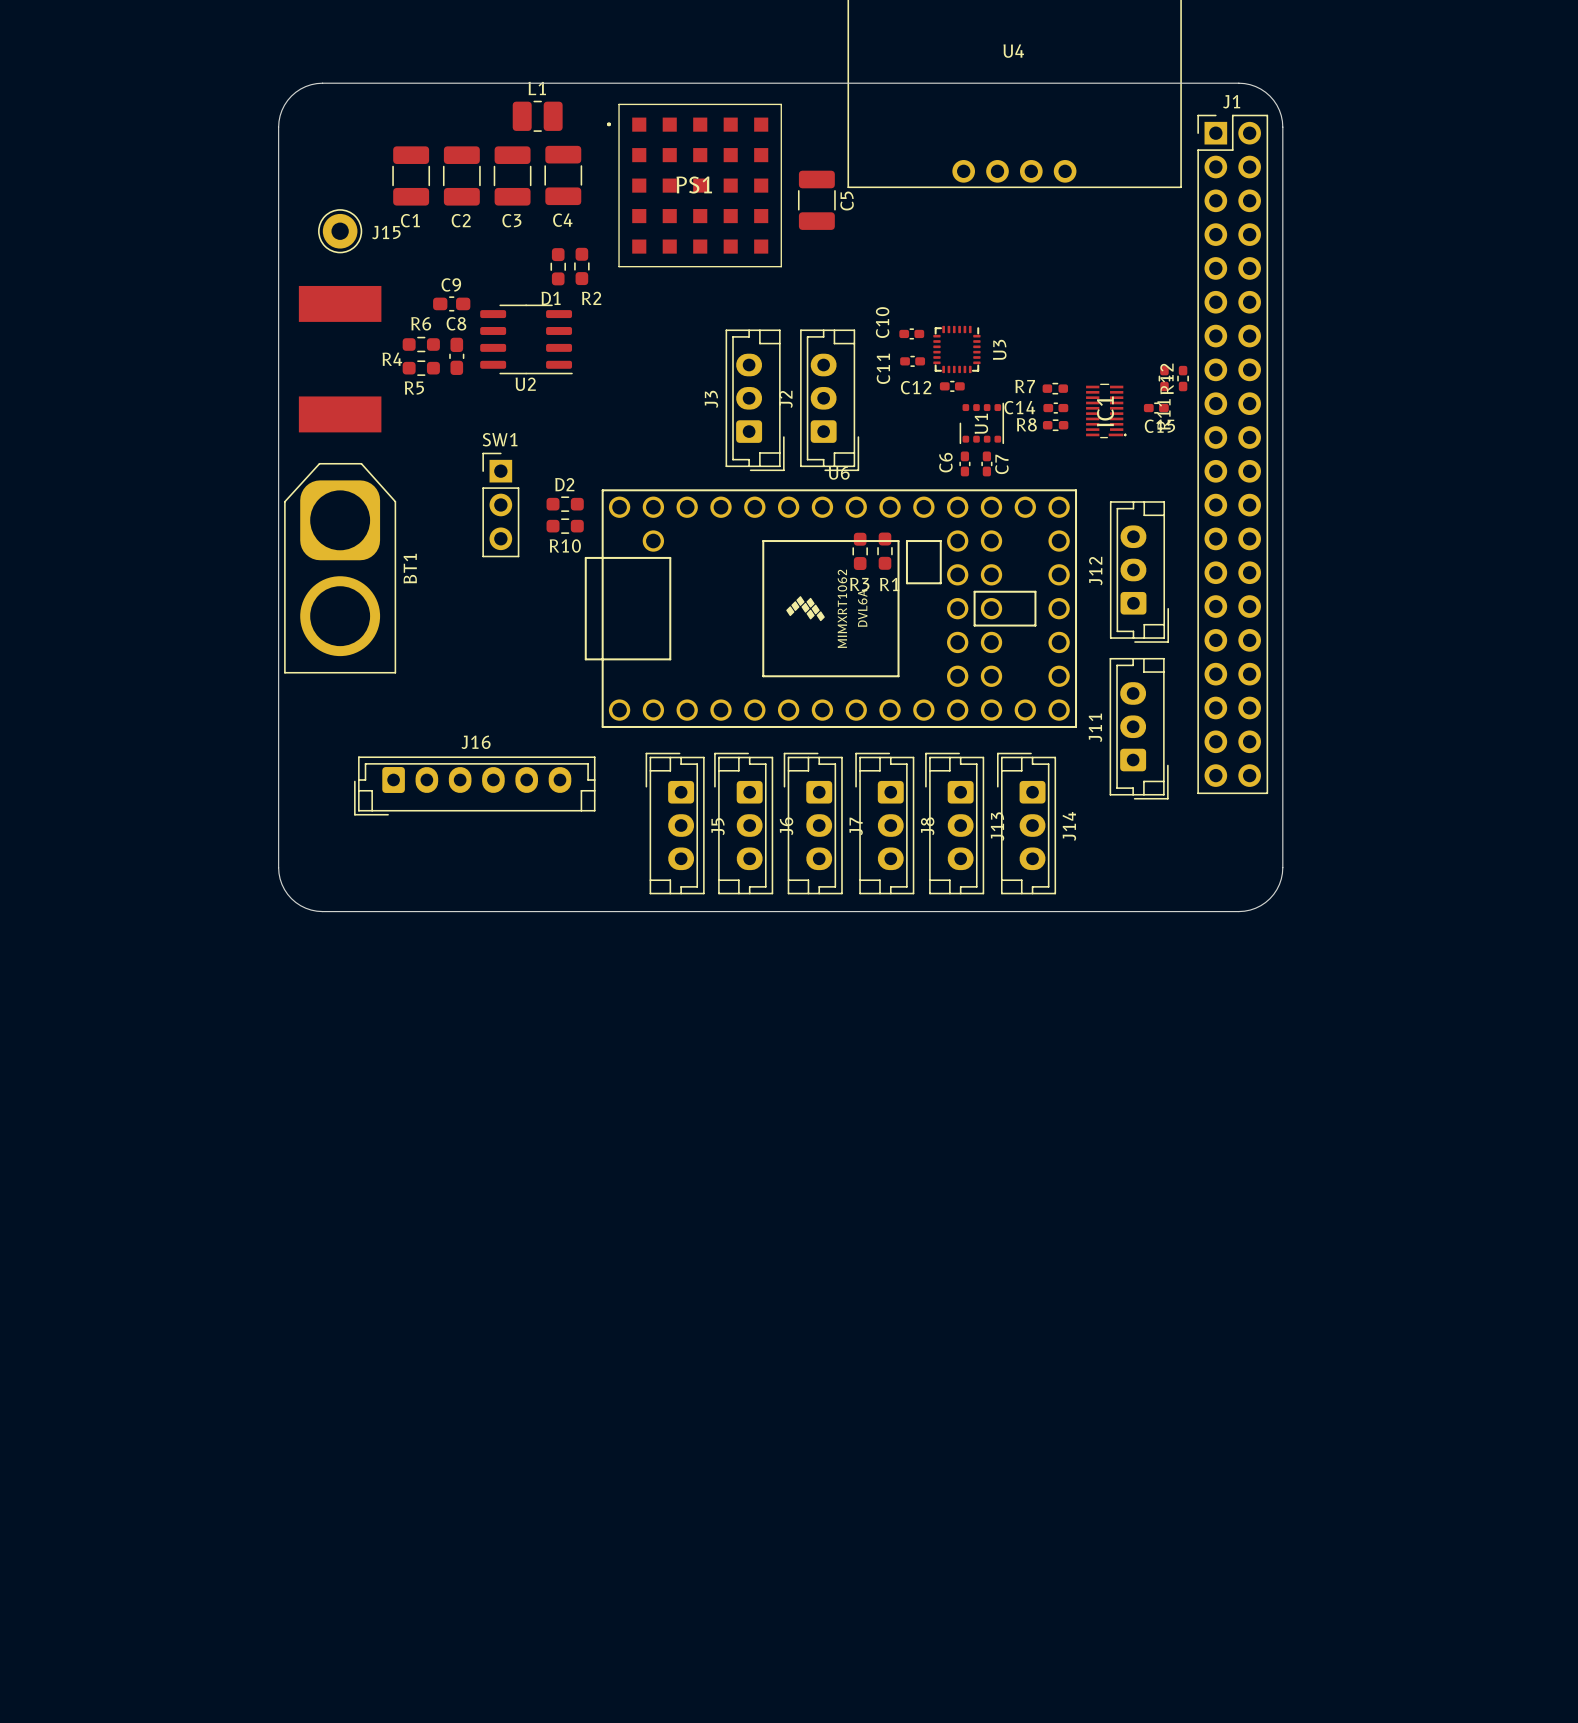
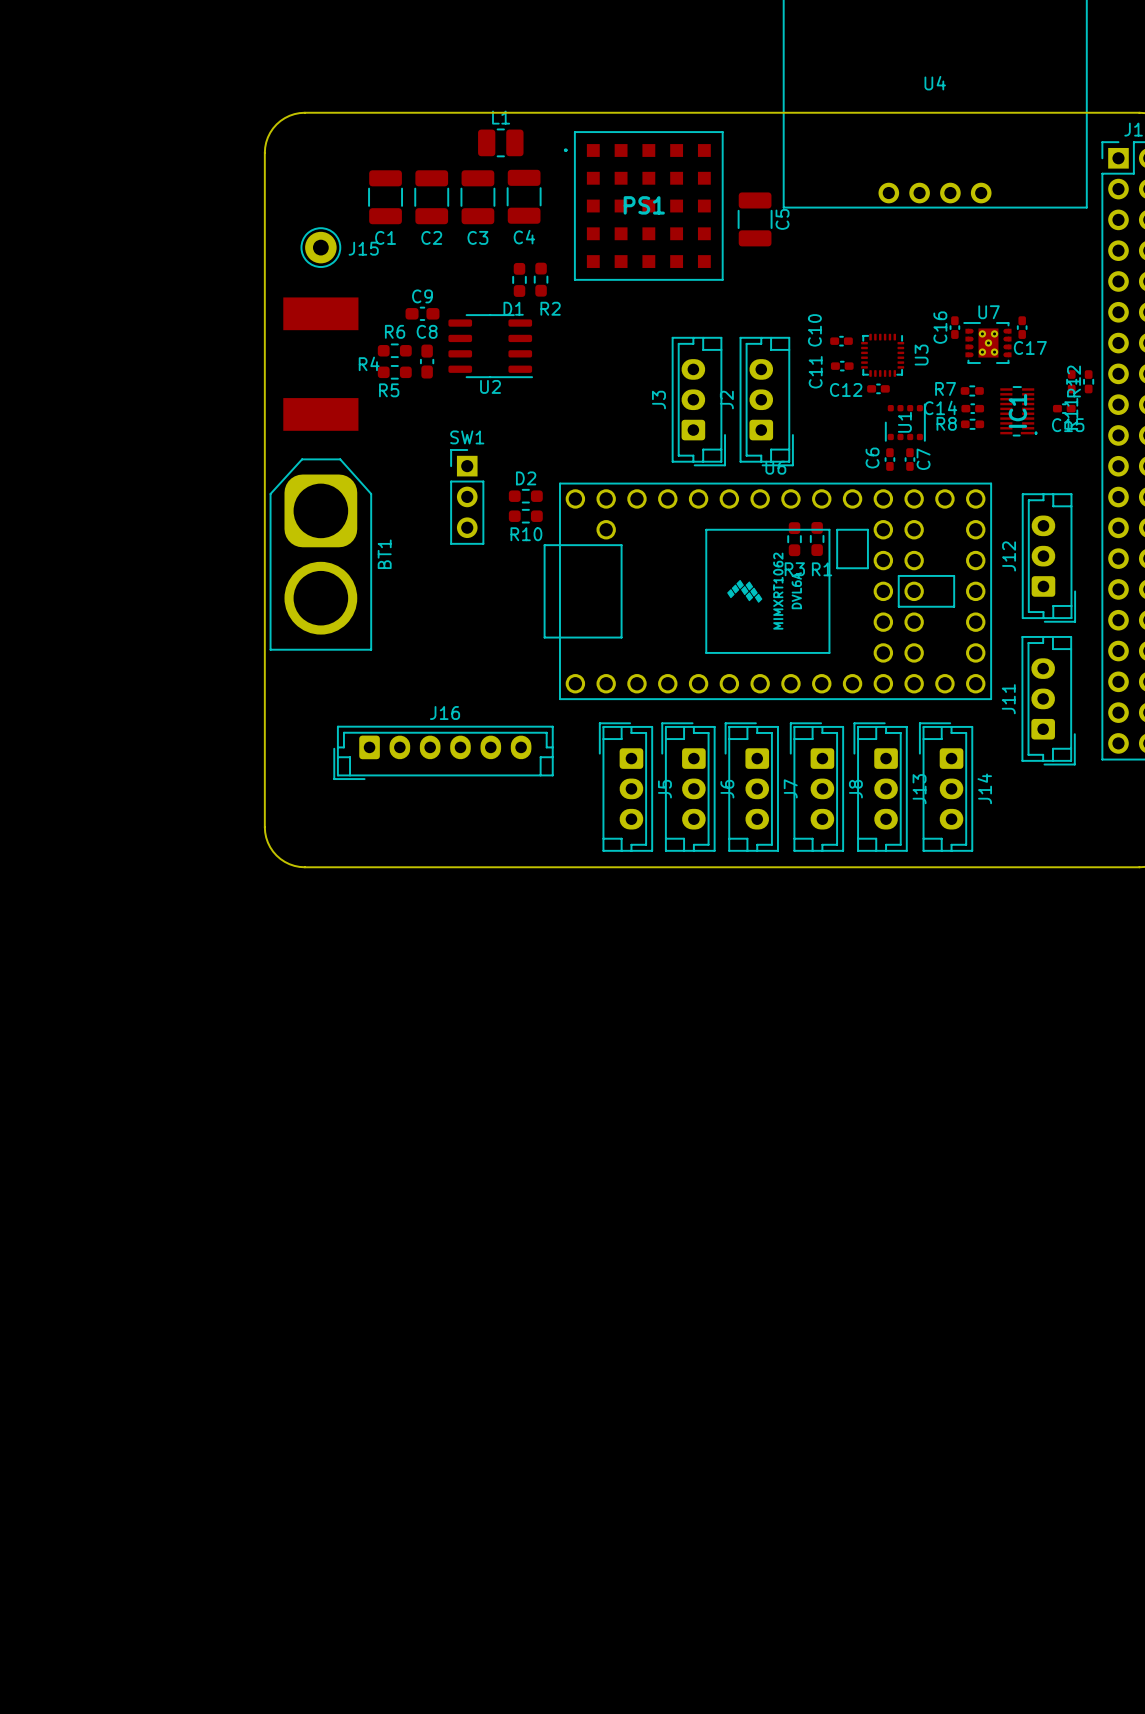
C16: none -> (954, 327)
C17: none -> (1022, 327)
U7: none -> (987, 343)

